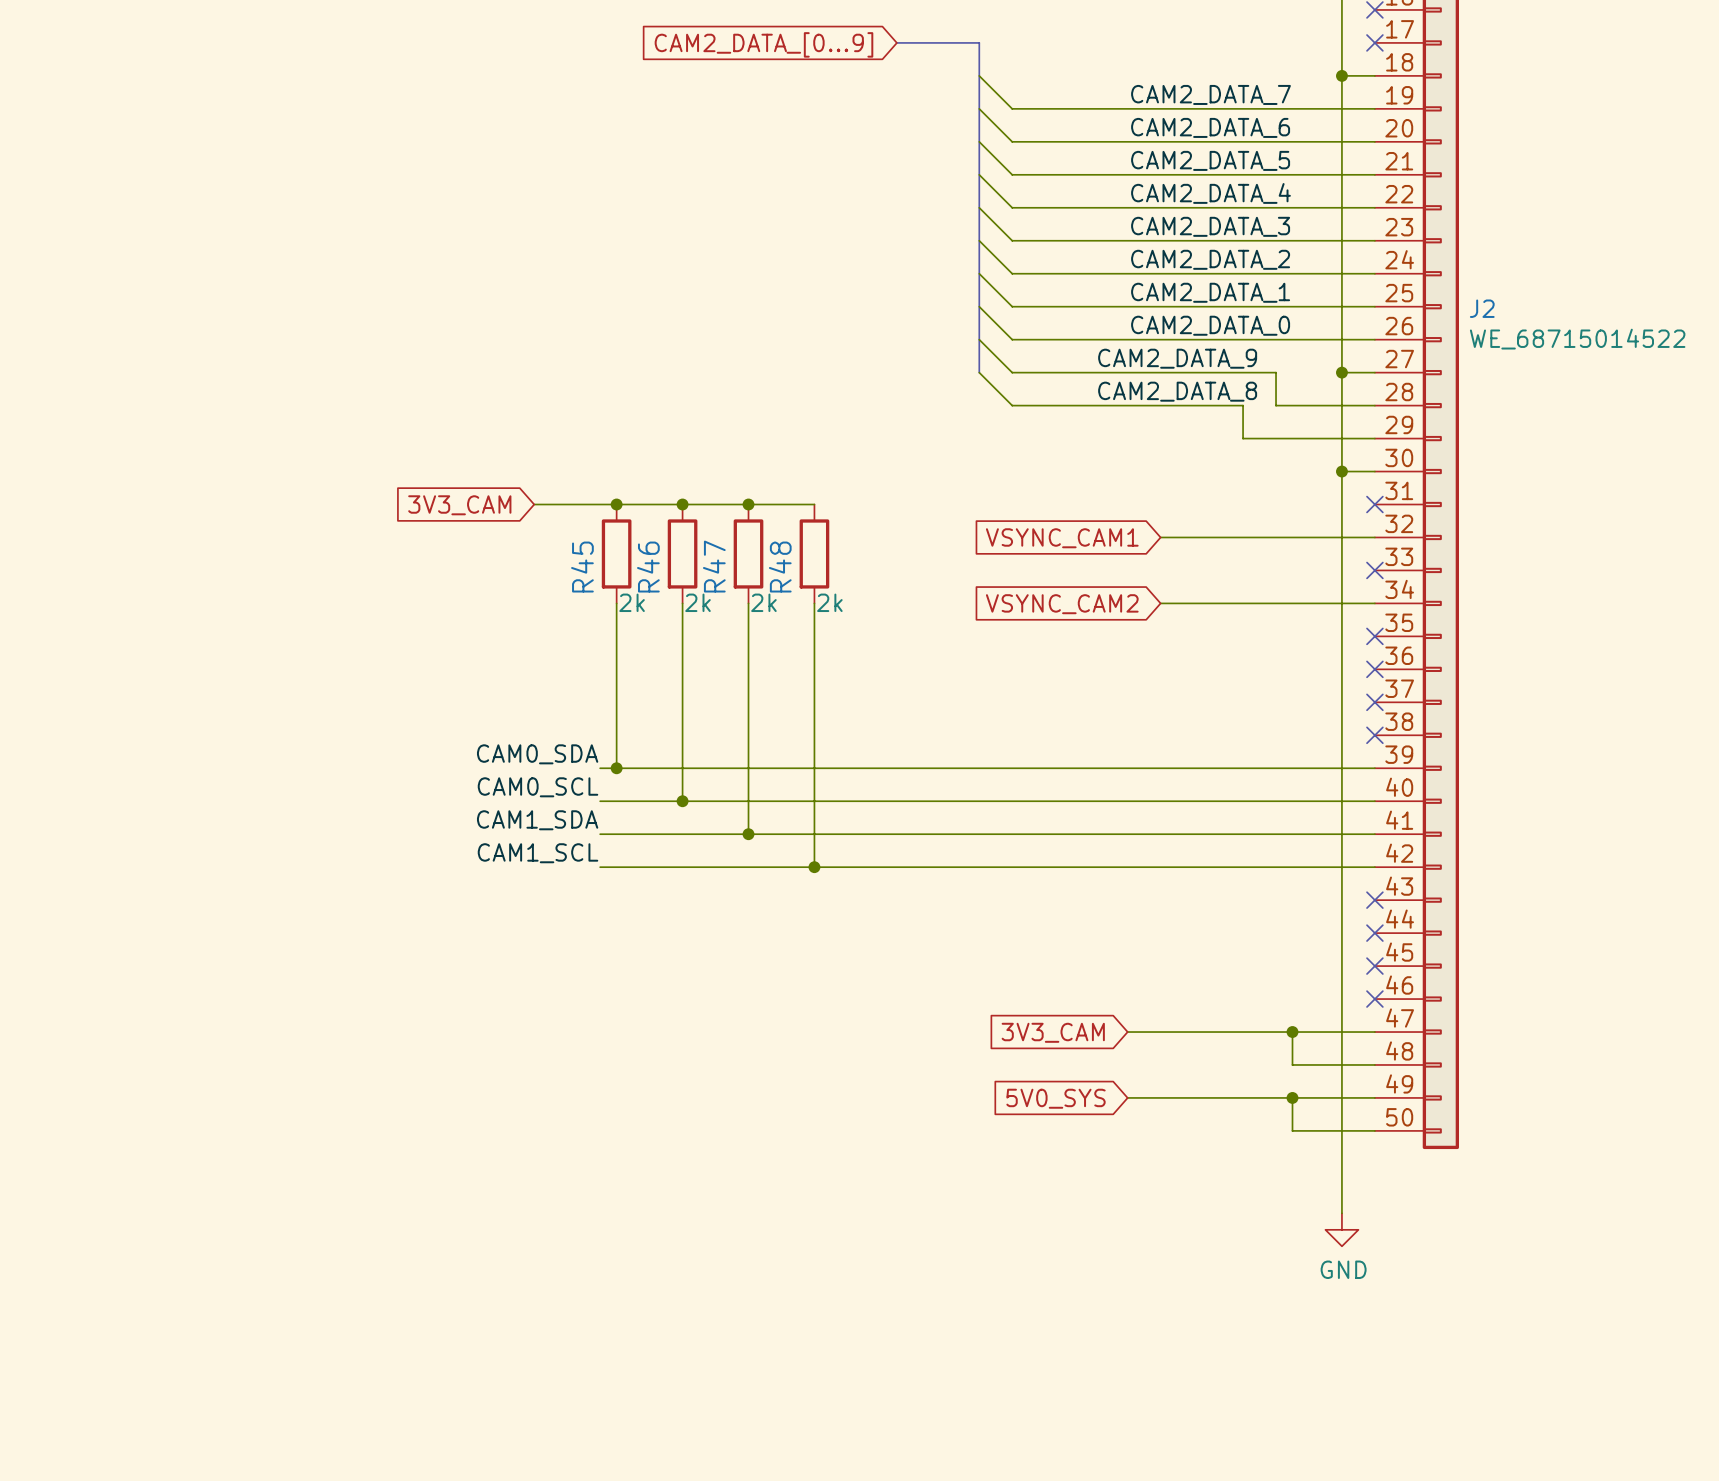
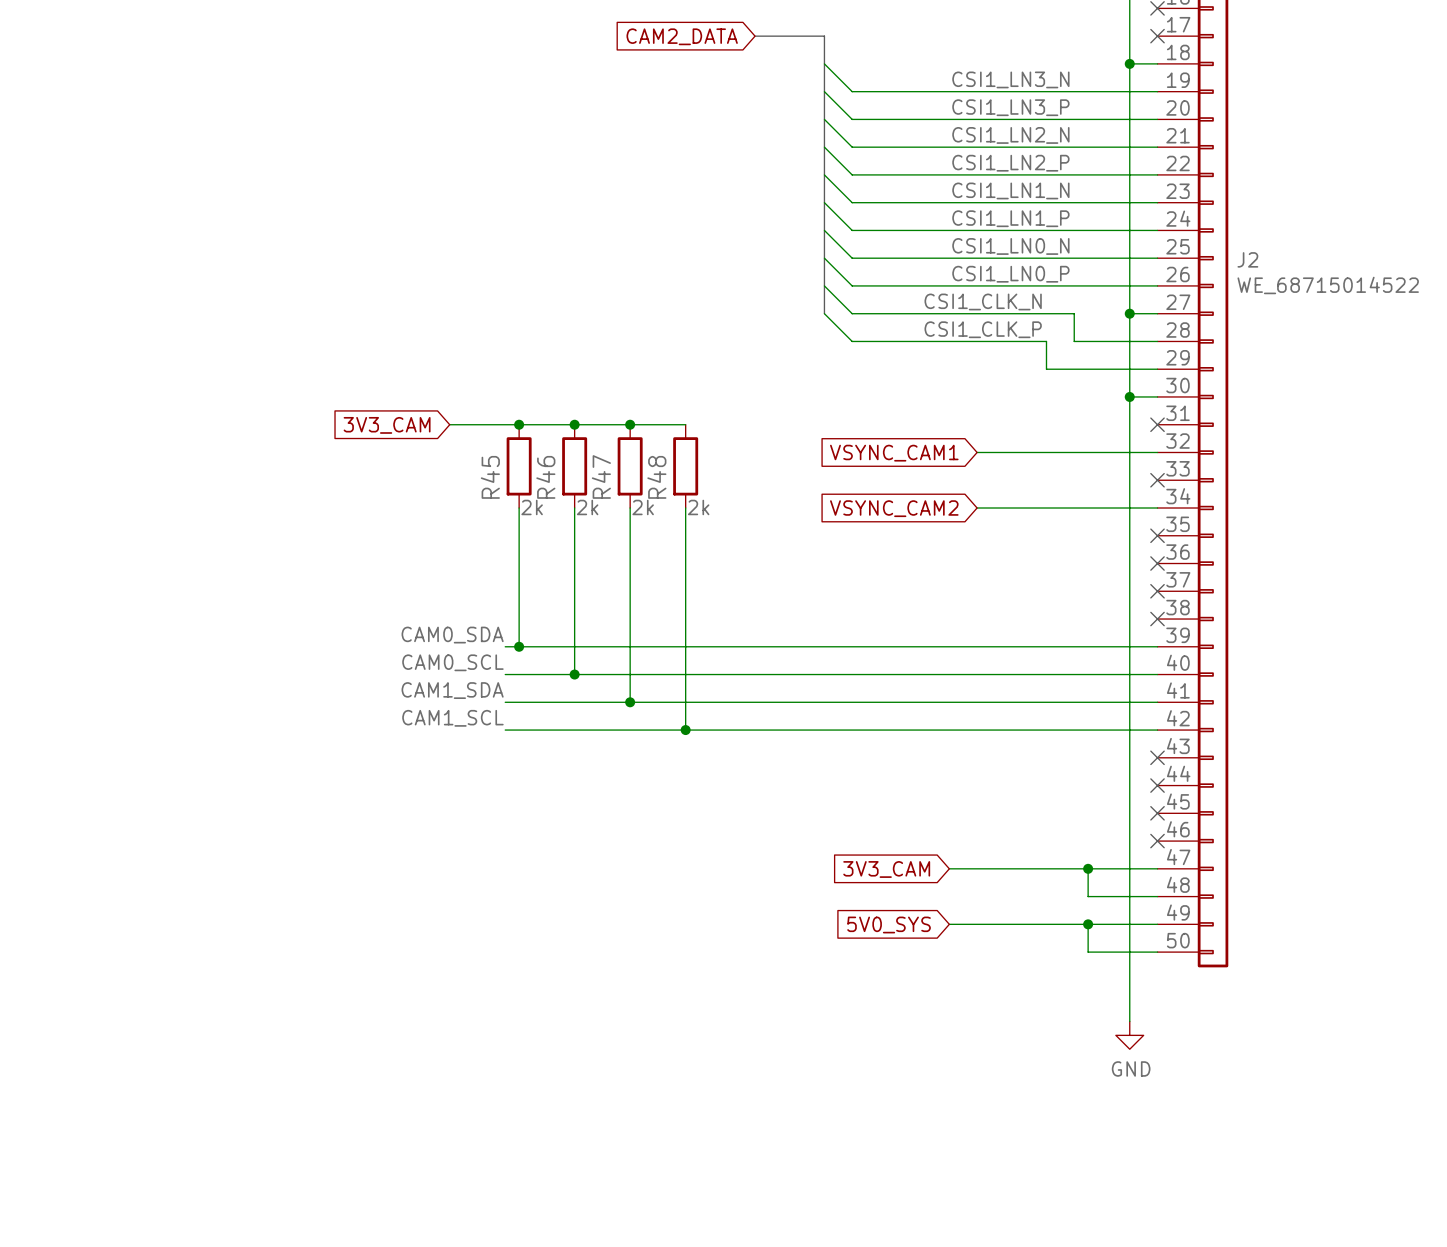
global label: CAM2_DATA_[0...9] (763, 44) -> CAM2_DATA (682, 36)
label: CAM2_DATA_7 (1210, 94) -> CSI1_LN3_N (1010, 79)
label: CAM2_DATA_6 (1210, 127) -> CSI1_LN3_P (1010, 107)
label: CAM2_DATA_5 (1210, 160) -> CSI1_LN2_N (1010, 135)
label: CAM2_DATA_4 (1210, 193) -> CSI1_LN2_P (1010, 163)
label: CAM2_DATA_3 (1210, 226) -> CSI1_LN1_N (1010, 190)
label: CAM2_DATA_2 (1210, 259) -> CSI1_LN1_P (1010, 218)
label: CAM2_DATA_1 (1210, 292) -> CSI1_LN0_N (1010, 246)
label: CAM2_DATA_0 (1210, 325) -> CSI1_LN0_P (1010, 274)
label: CAM2_DATA_9 (1177, 358) -> CSI1_CLK_N (983, 301)
label: CAM2_DATA_8 (1177, 391) -> CSI1_CLK_P (983, 329)

